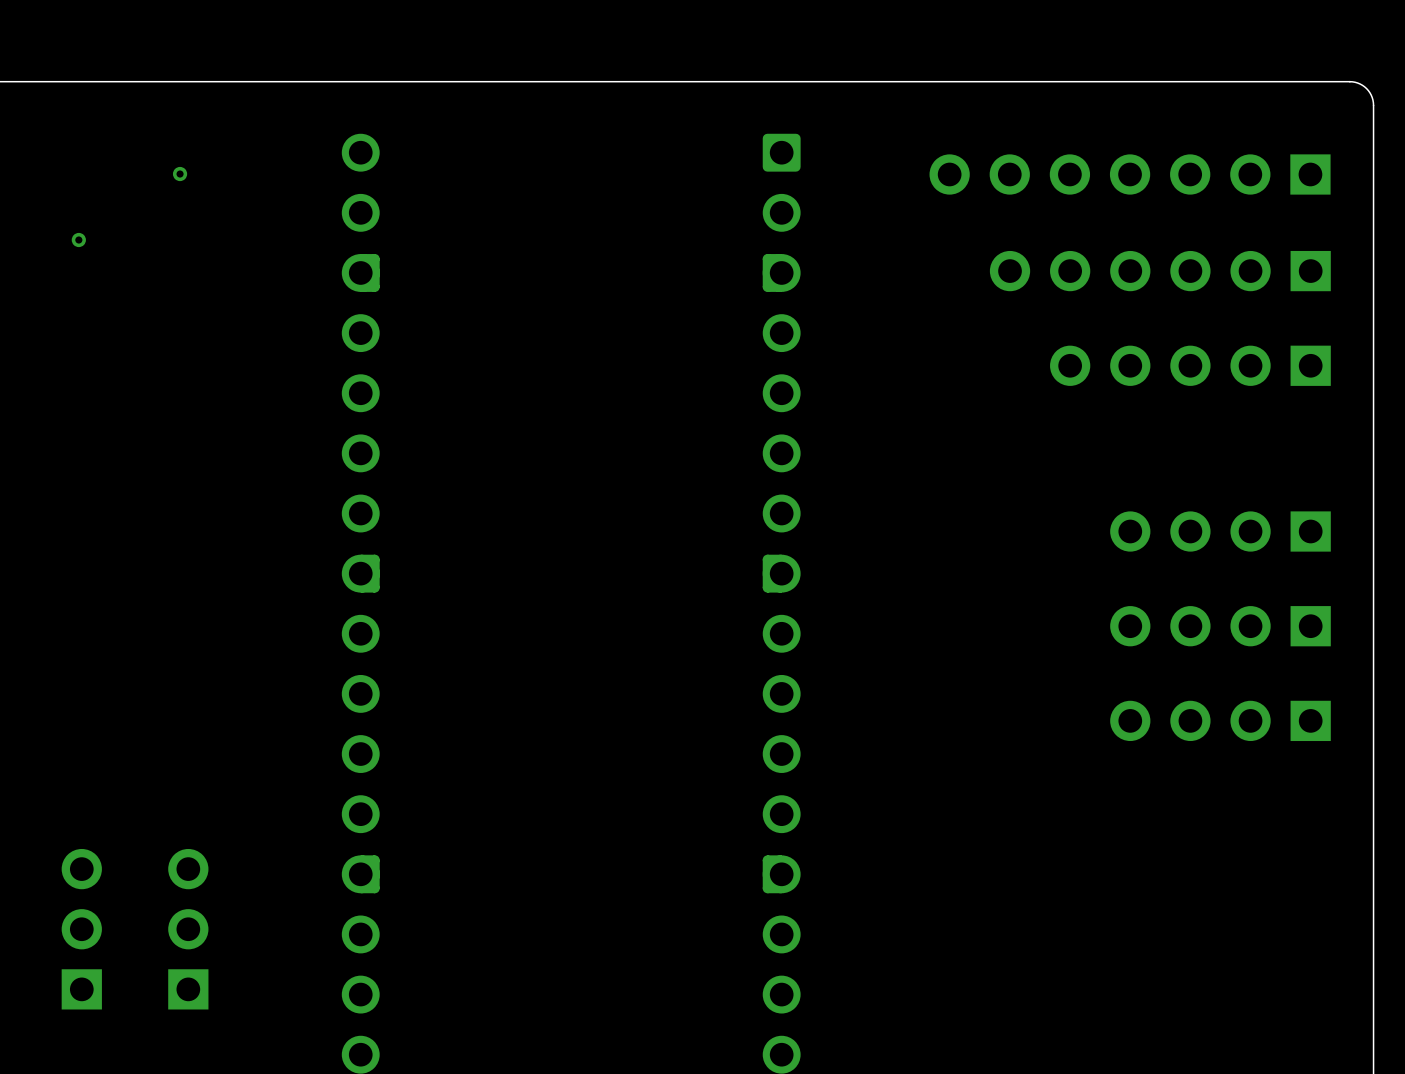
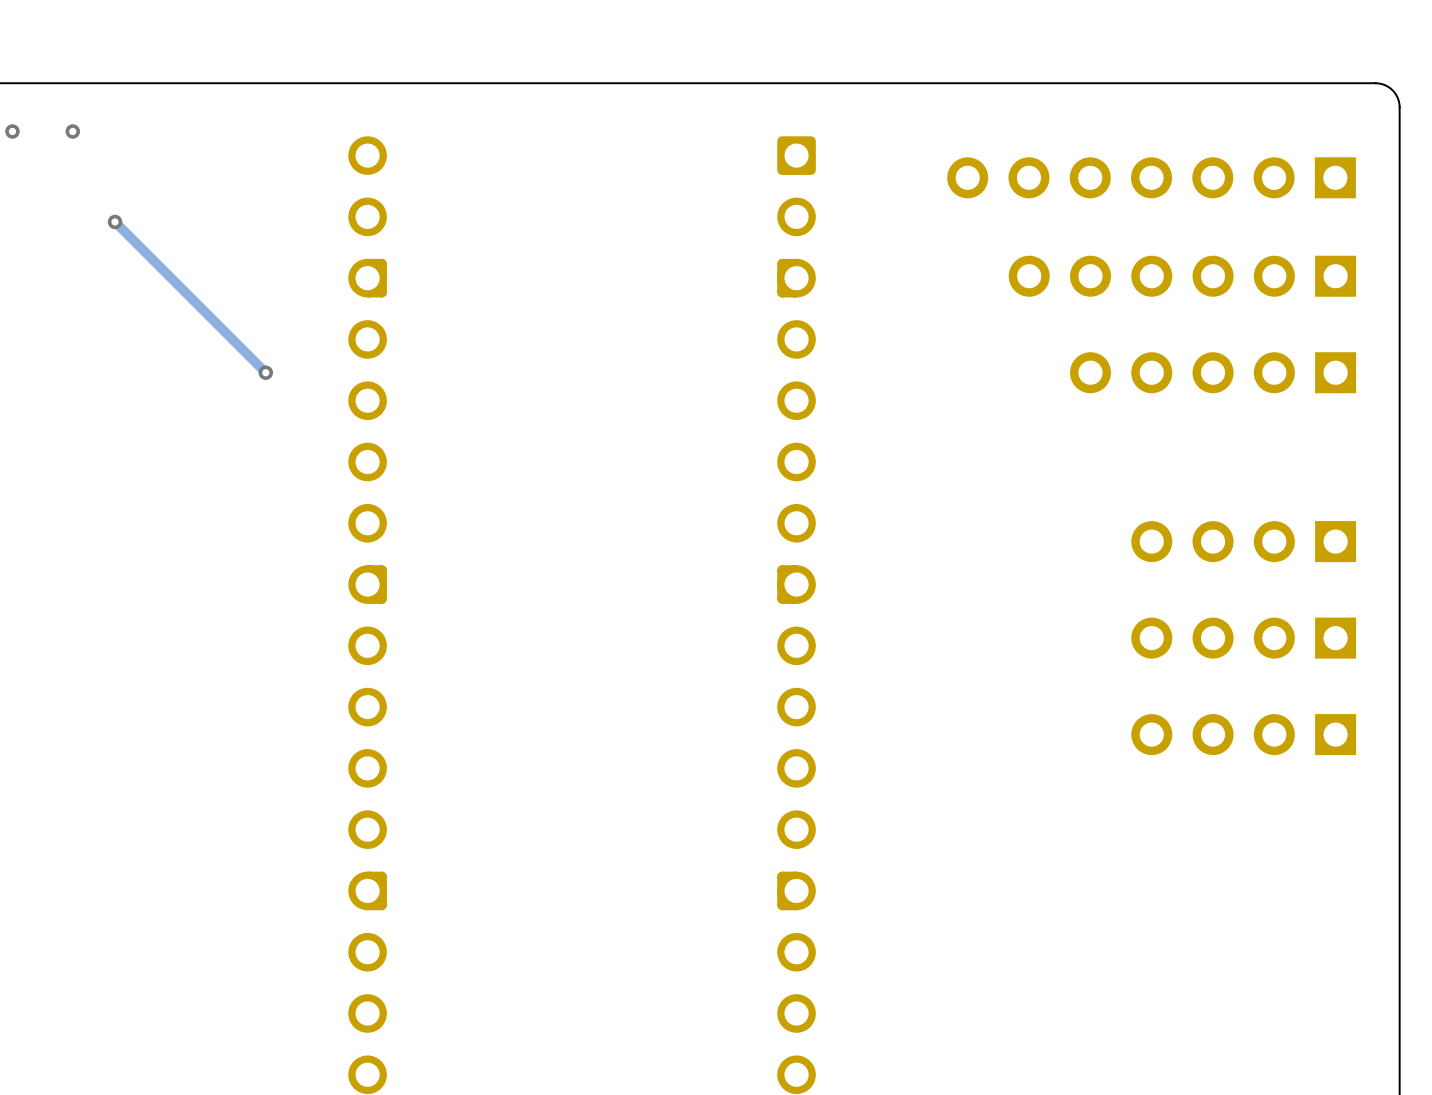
via: none -> (12, 131)
via: none -> (72, 131)
via: (180, 174) -> none
track: none -> (115, 221) (265, 372)
via: none -> (115, 221)
via: (78, 240) -> none
via: none -> (265, 372)
part: (81, 929) -> none
part: (188, 929) -> none

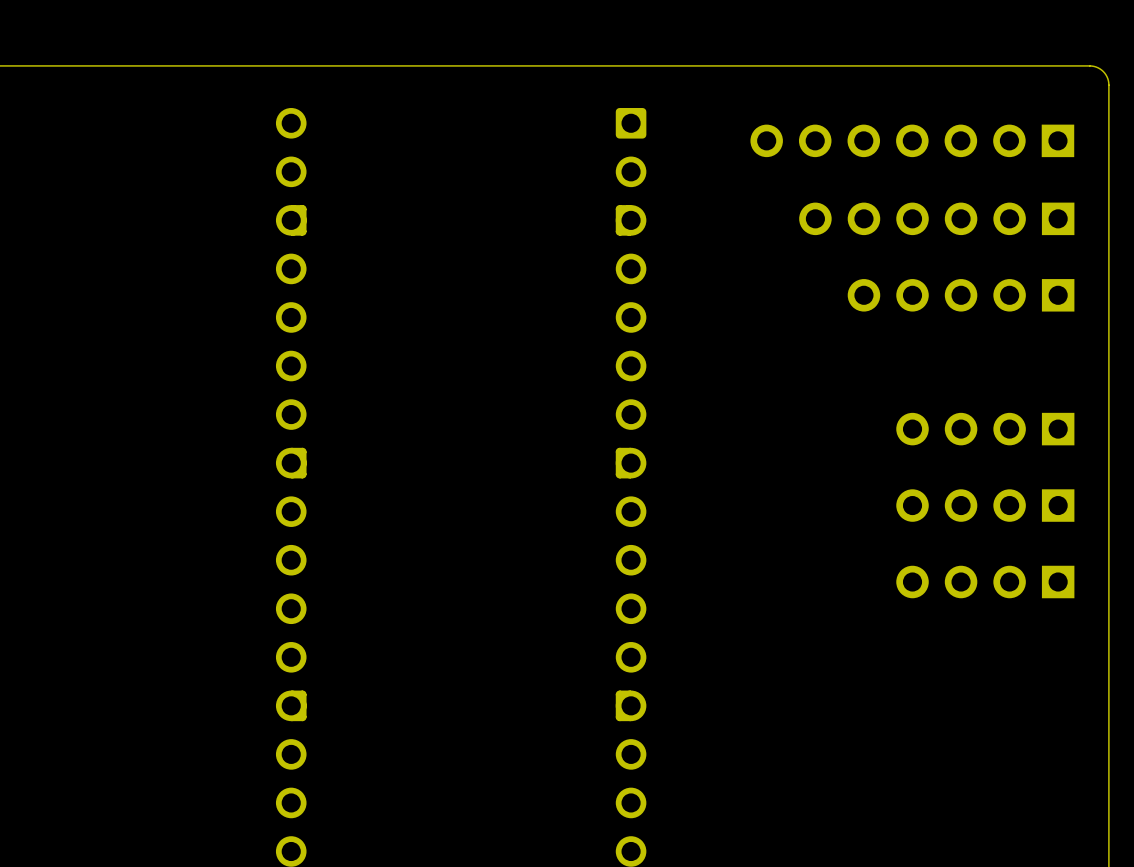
via: (12, 131) -> none
via: (72, 131) -> none
track: (115, 221) (265, 372) -> none
via: (115, 221) -> none
via: (265, 372) -> none

